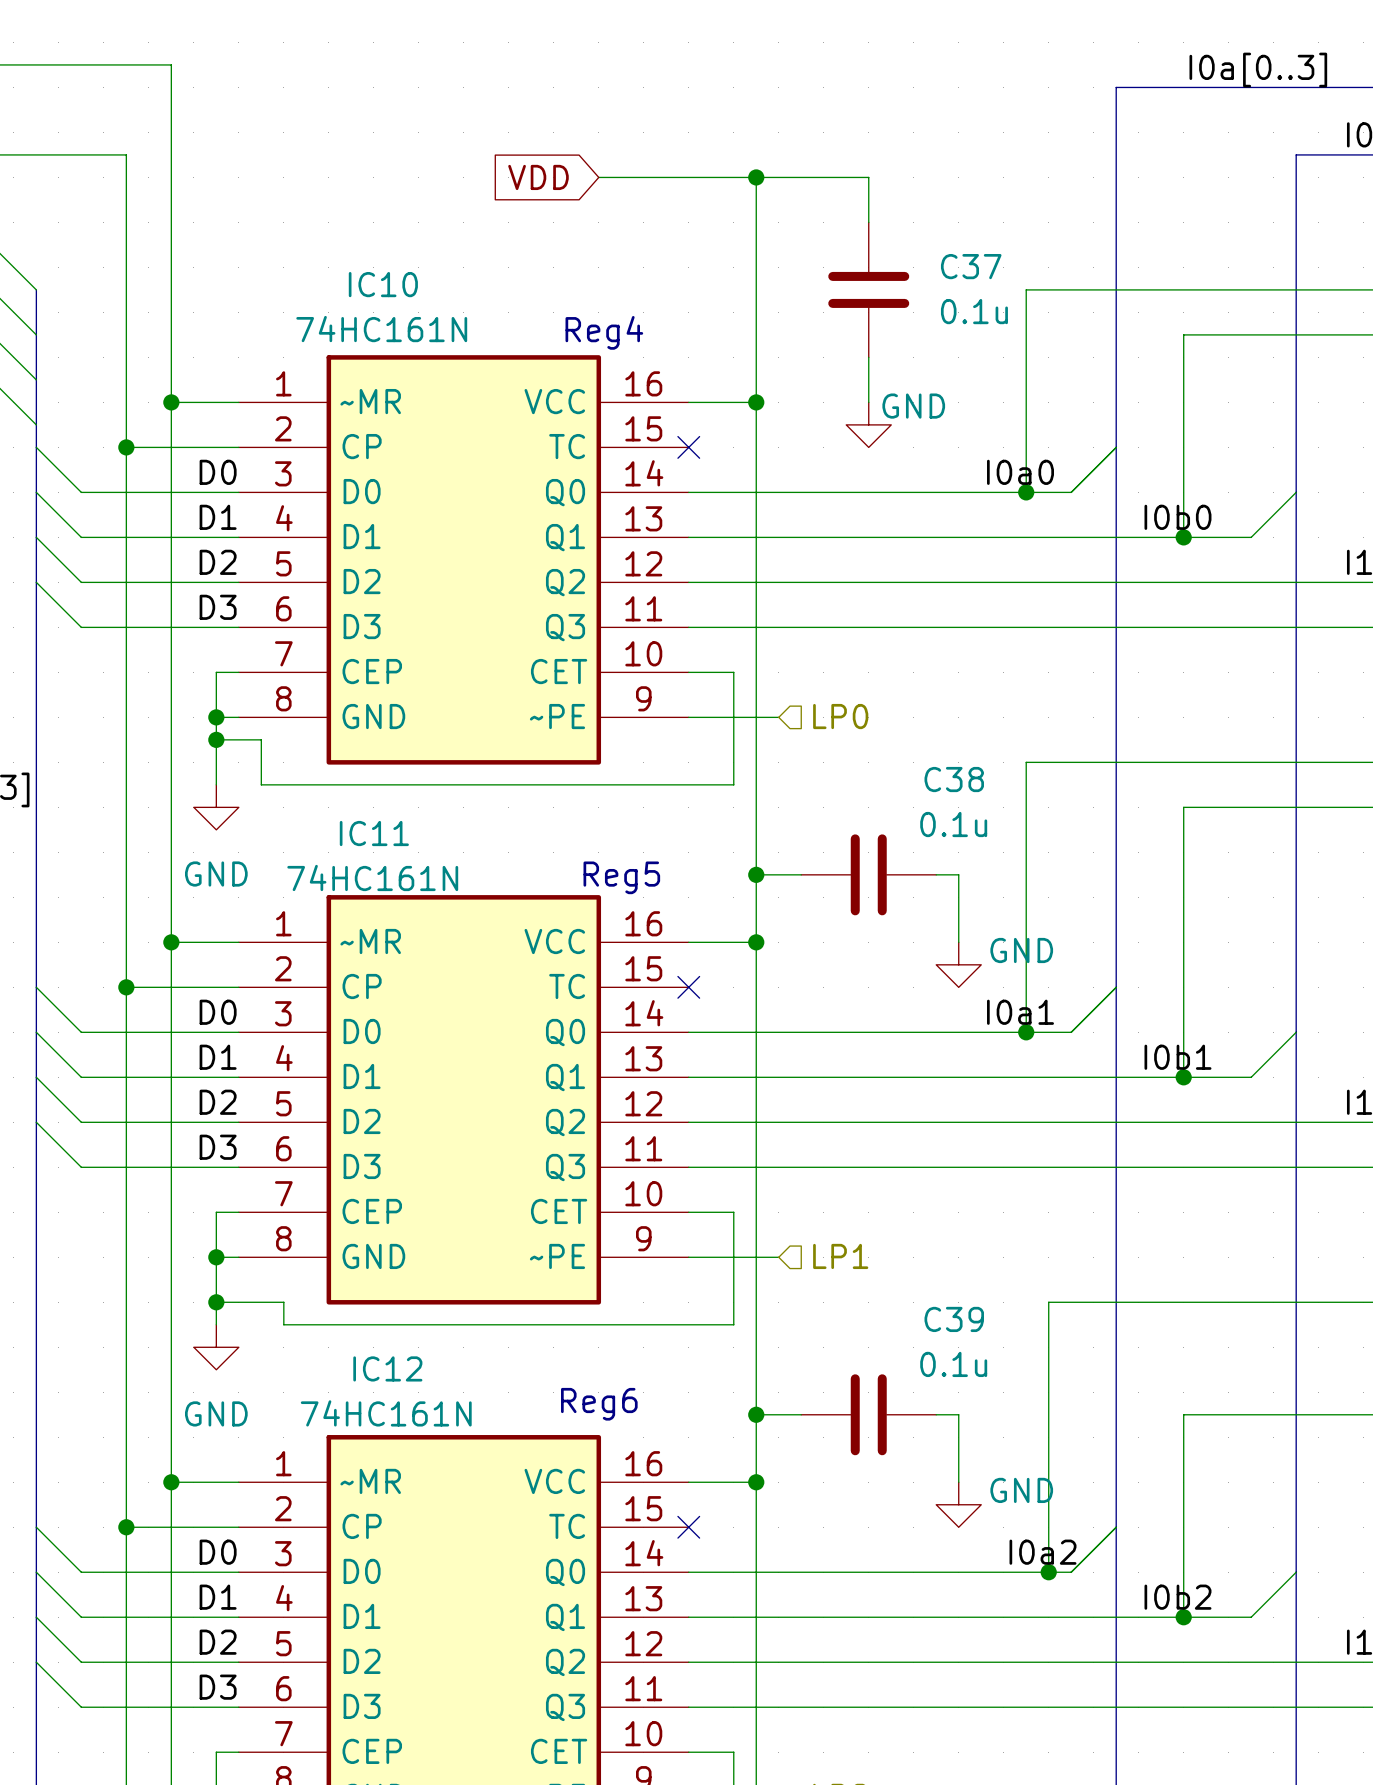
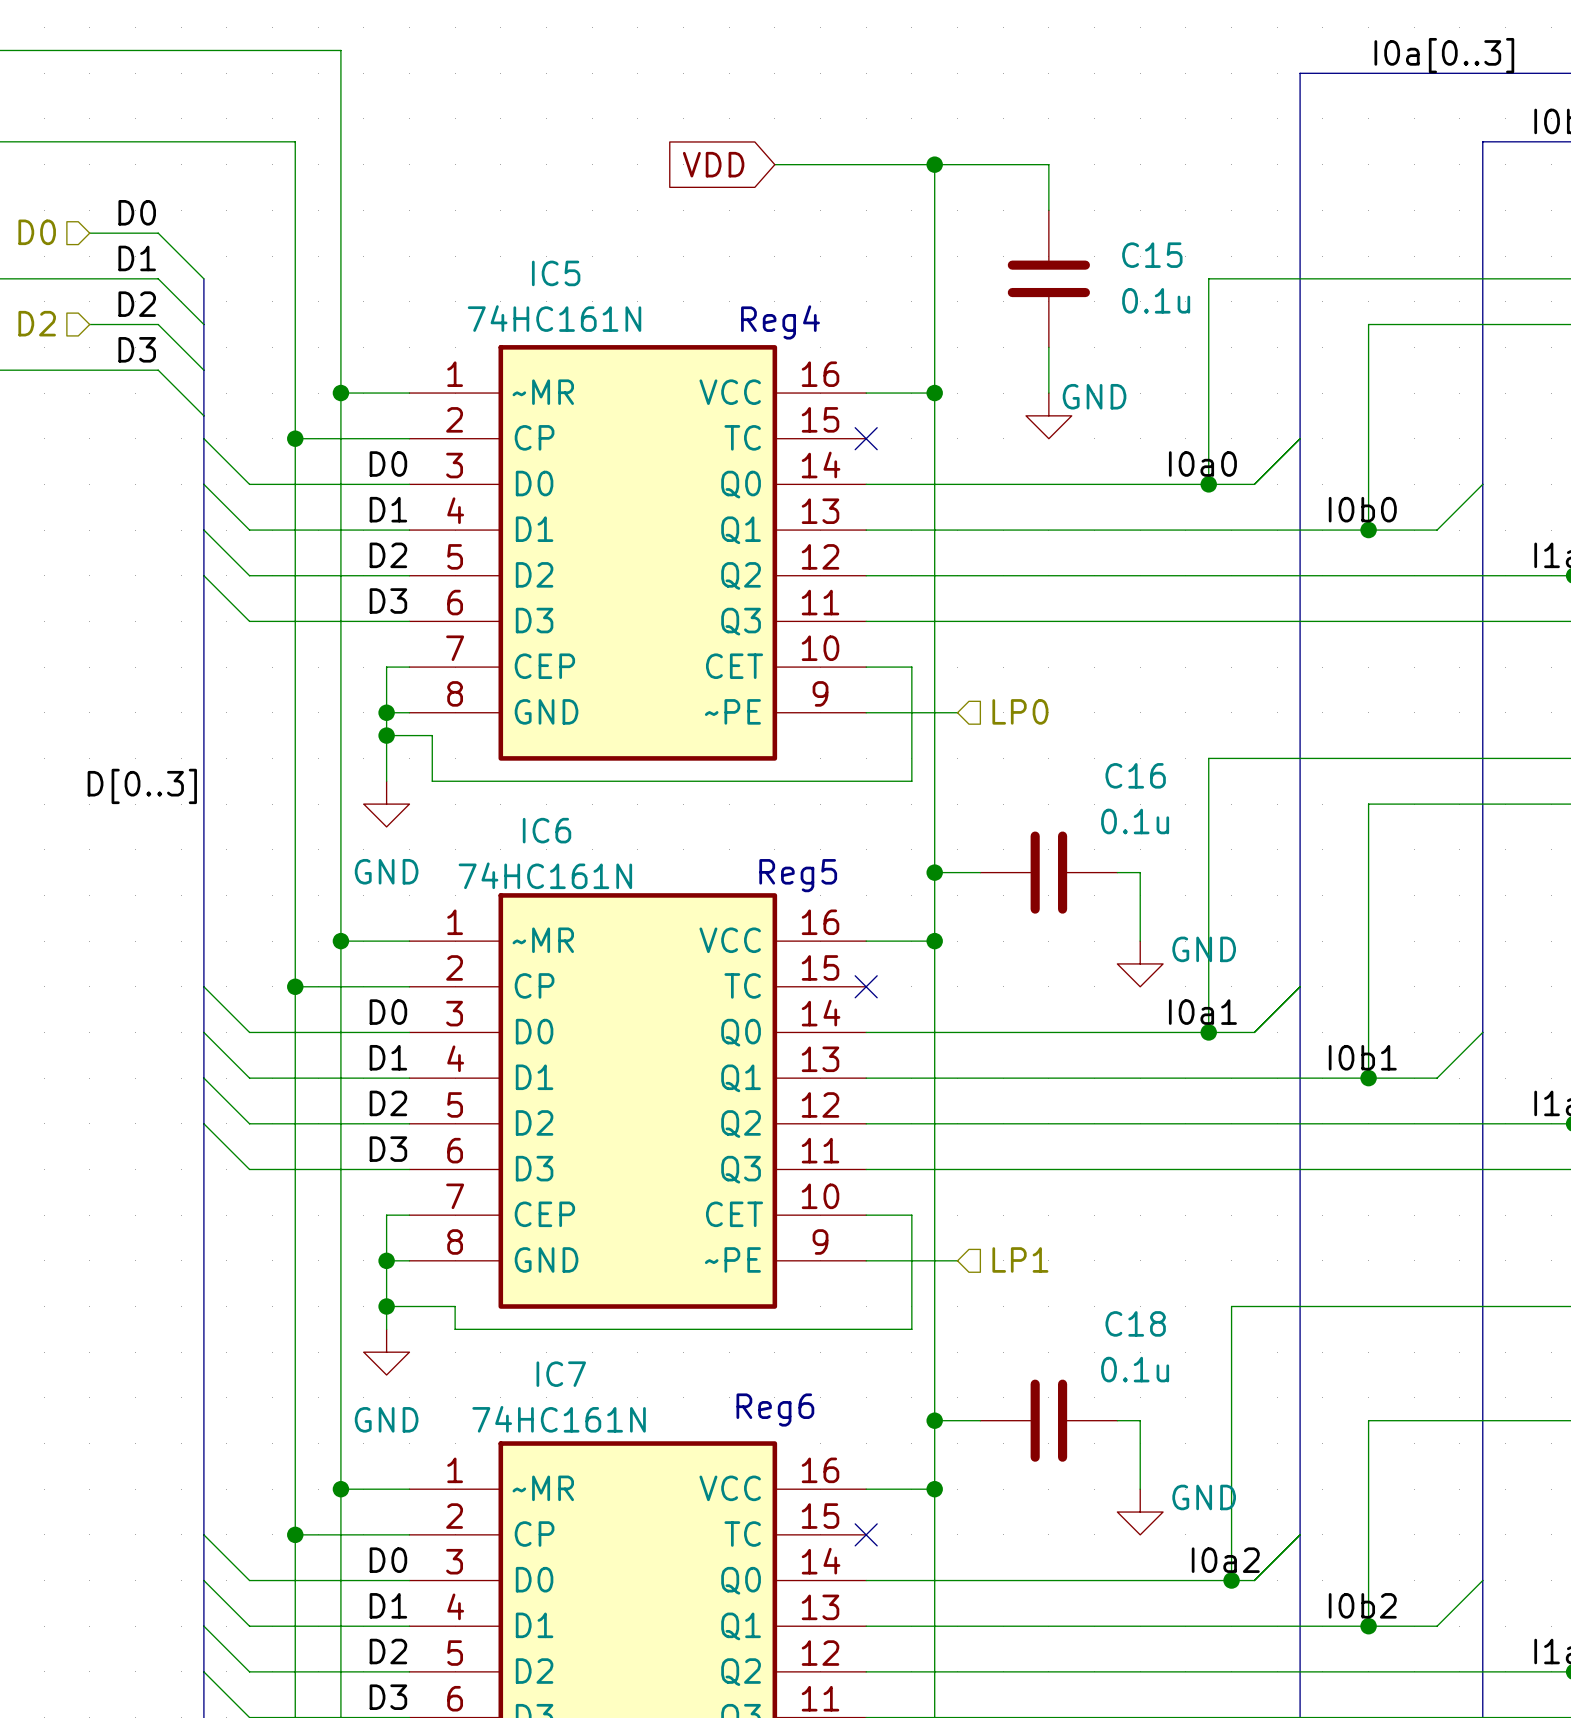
C37 name: C37 (971, 266) -> C15 (1152, 255)
IC10 name: IC10 (383, 284) -> IC5 (556, 273)
C38 name: C38 (954, 779) -> C16 (1135, 775)
IC11 name: IC11 (374, 833) -> IC6 (547, 830)
C39 name: C39 (954, 1319) -> C18 (1135, 1323)
IC12 name: IC12 (387, 1368) -> IC7 (561, 1374)

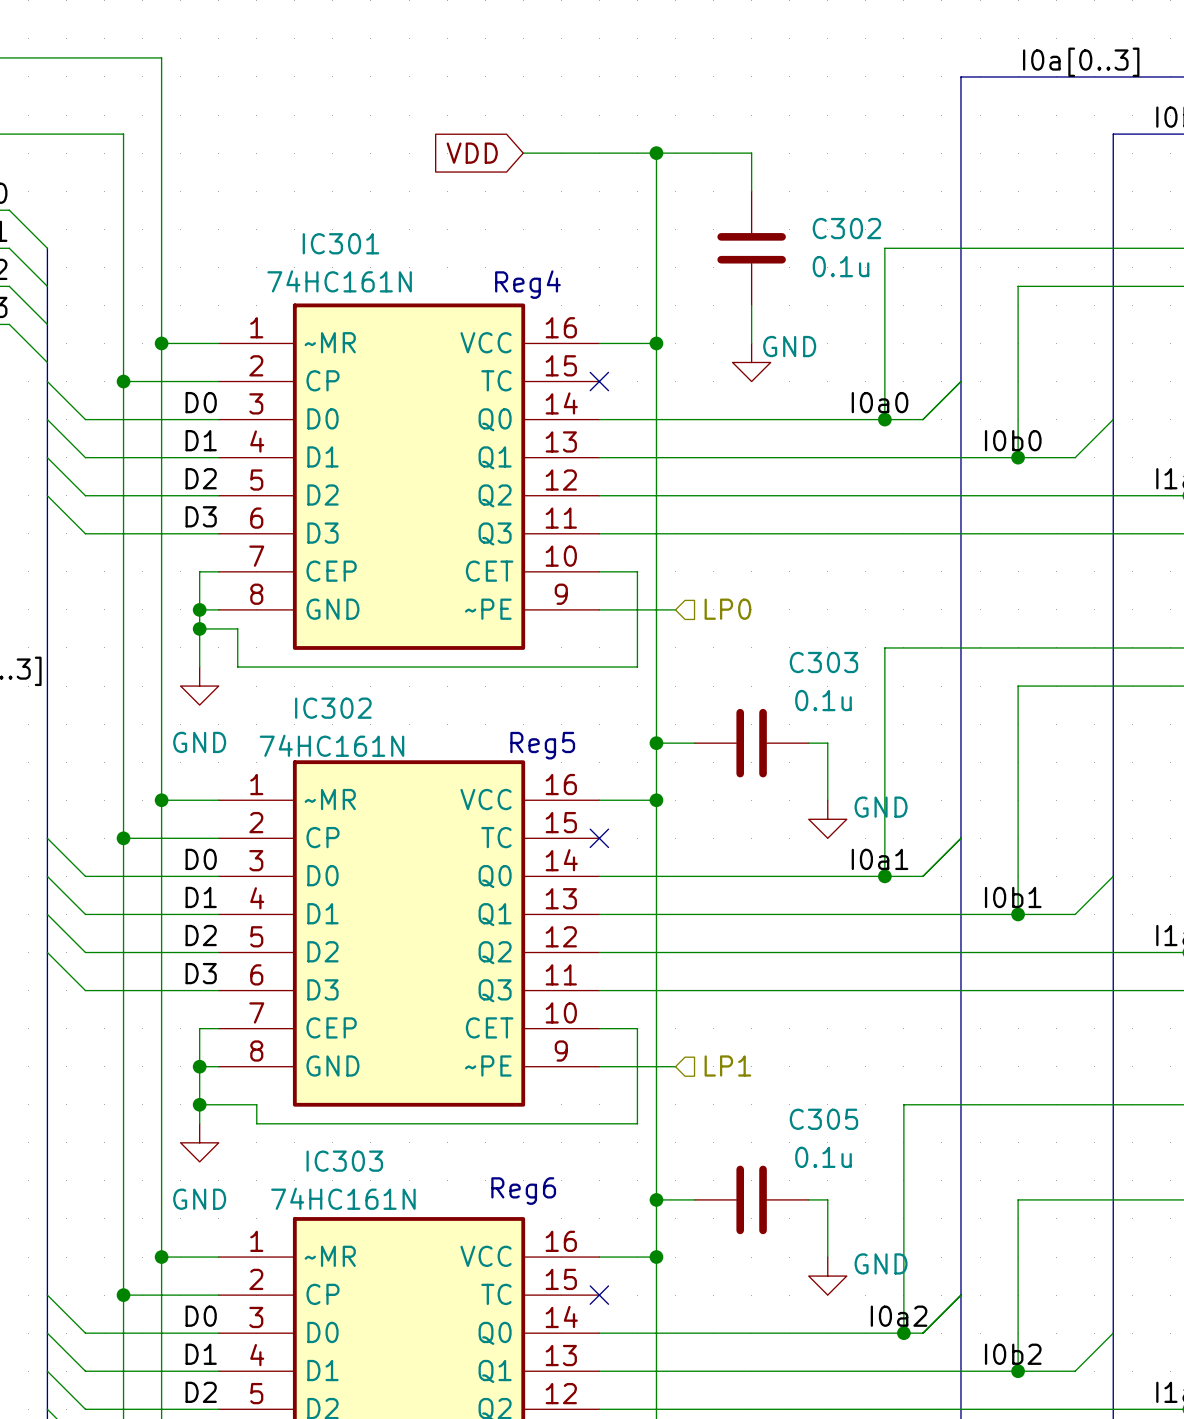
C15 name: C15 (1152, 255) -> C302 (846, 228)
IC5 name: IC5 (556, 273) -> IC301 (340, 243)
C16 name: C16 (1135, 775) -> C303 (823, 662)
IC6 name: IC6 (547, 830) -> IC302 (333, 708)
C18 name: C18 (1135, 1323) -> C305 (823, 1119)
IC7 name: IC7 (561, 1374) -> IC303 (344, 1161)

